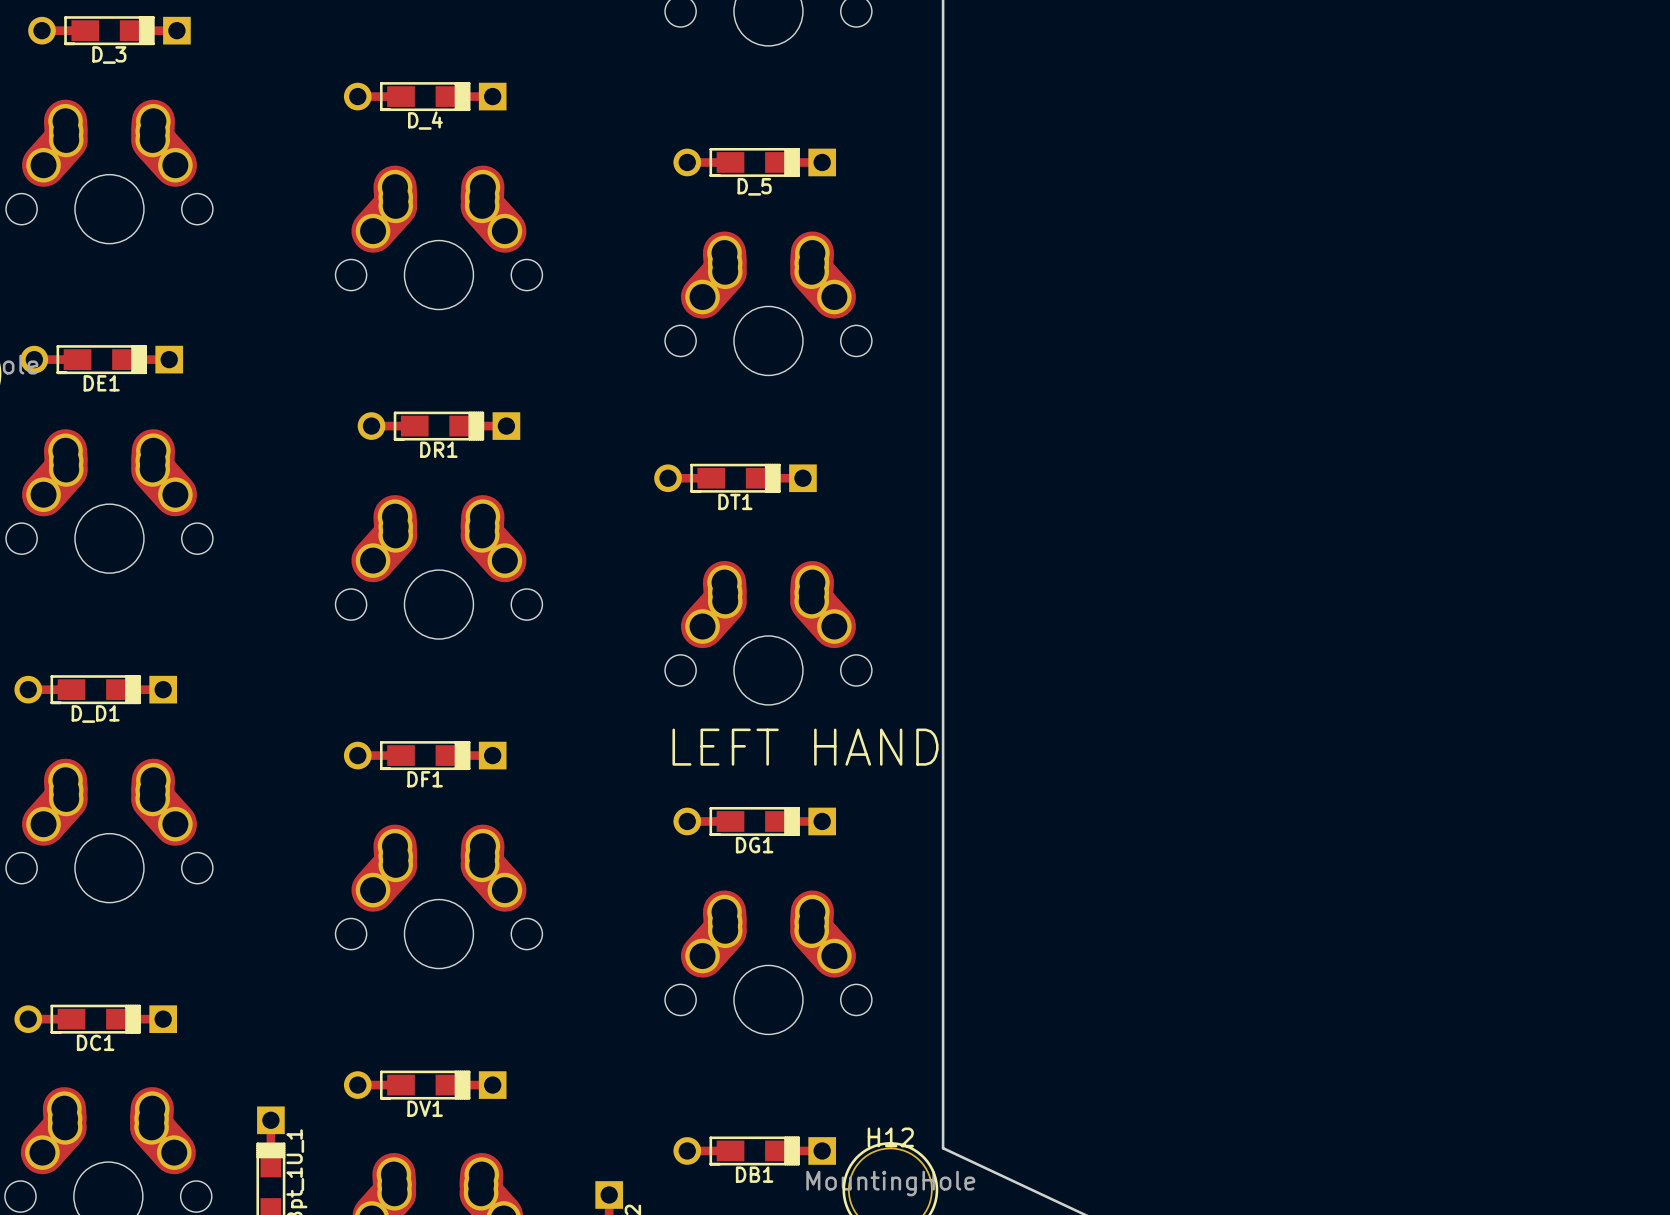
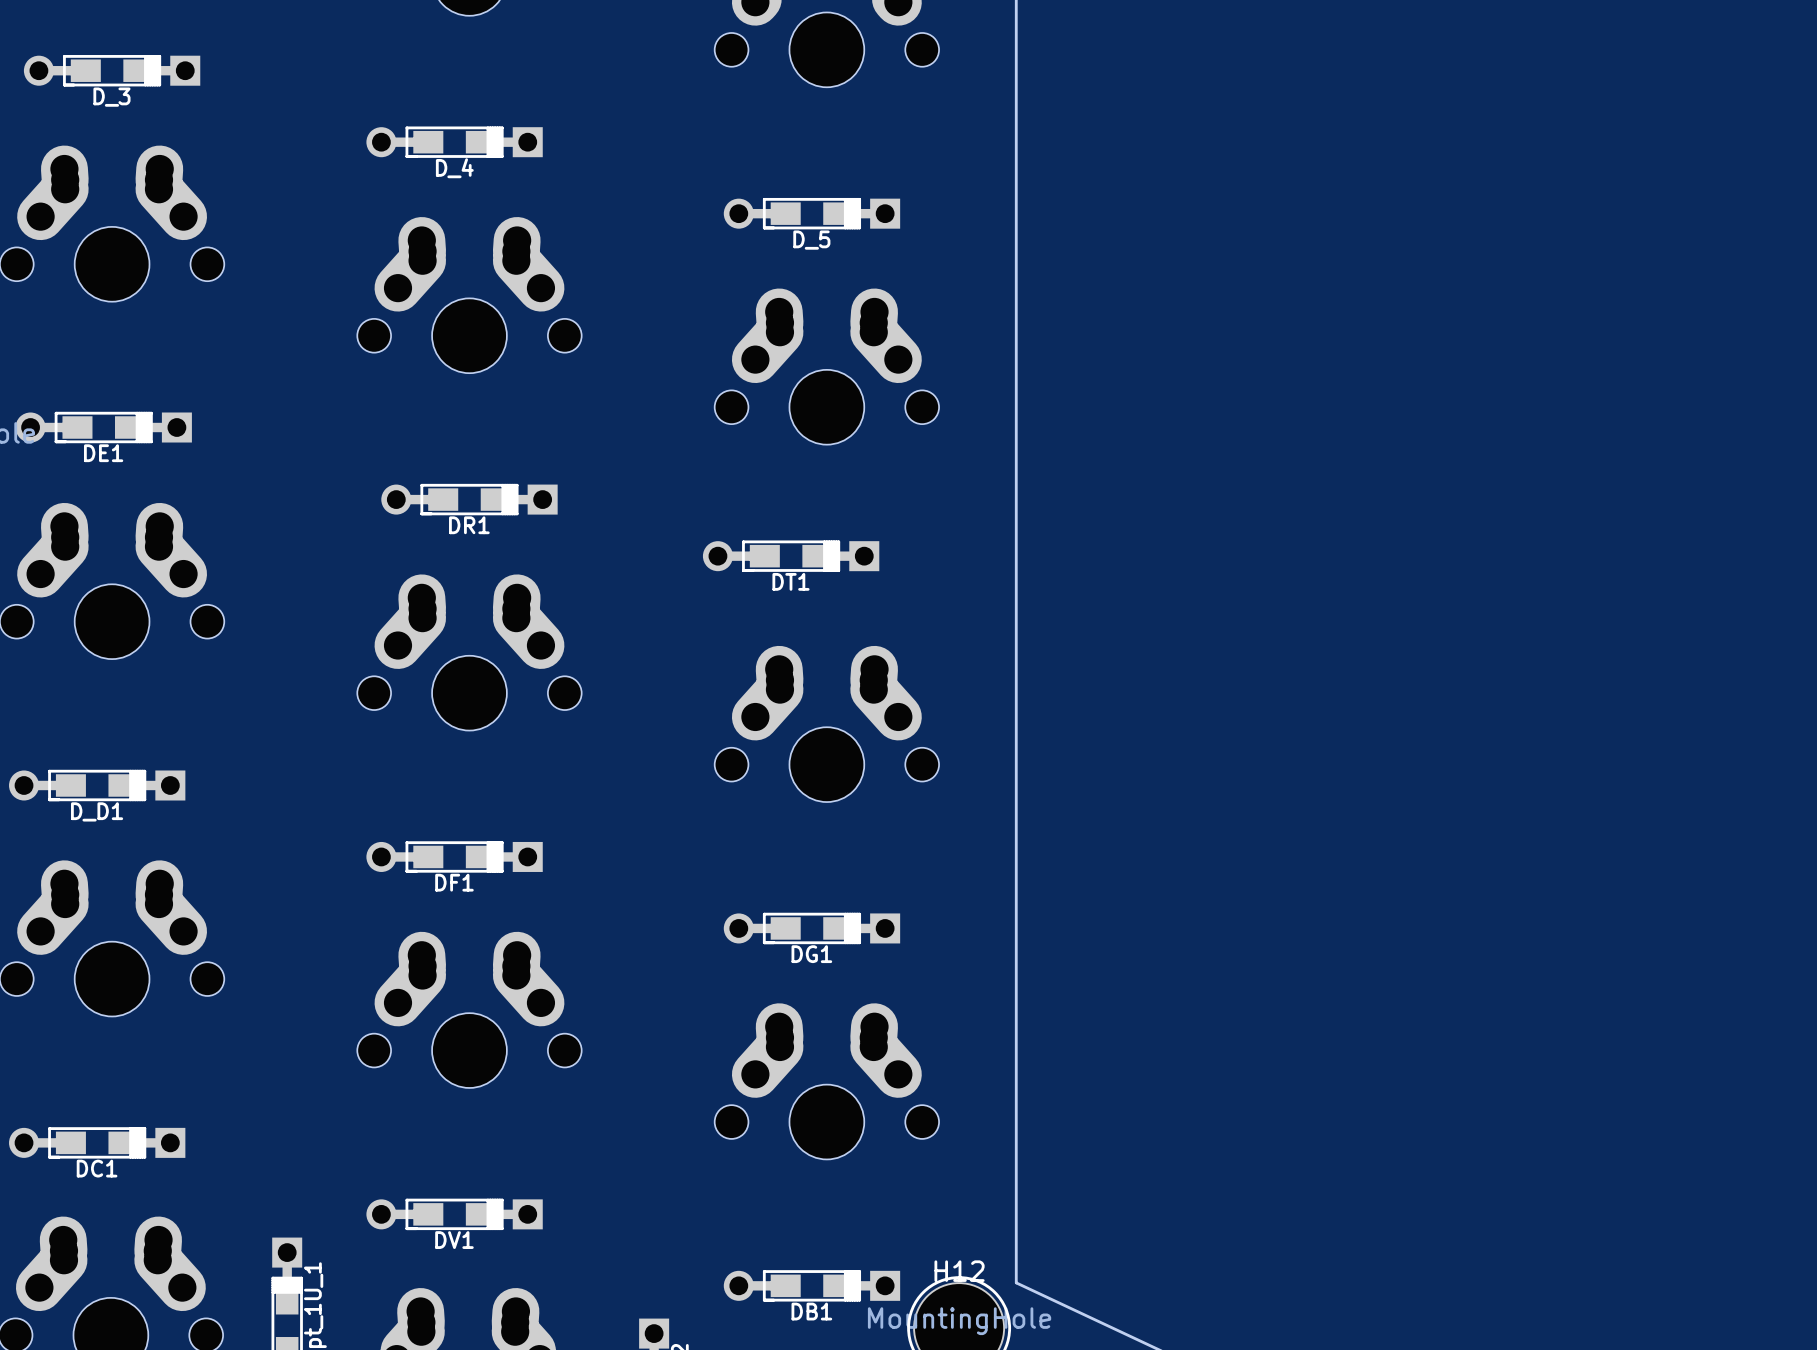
text: LEFT HAND (805, 747) -> none

